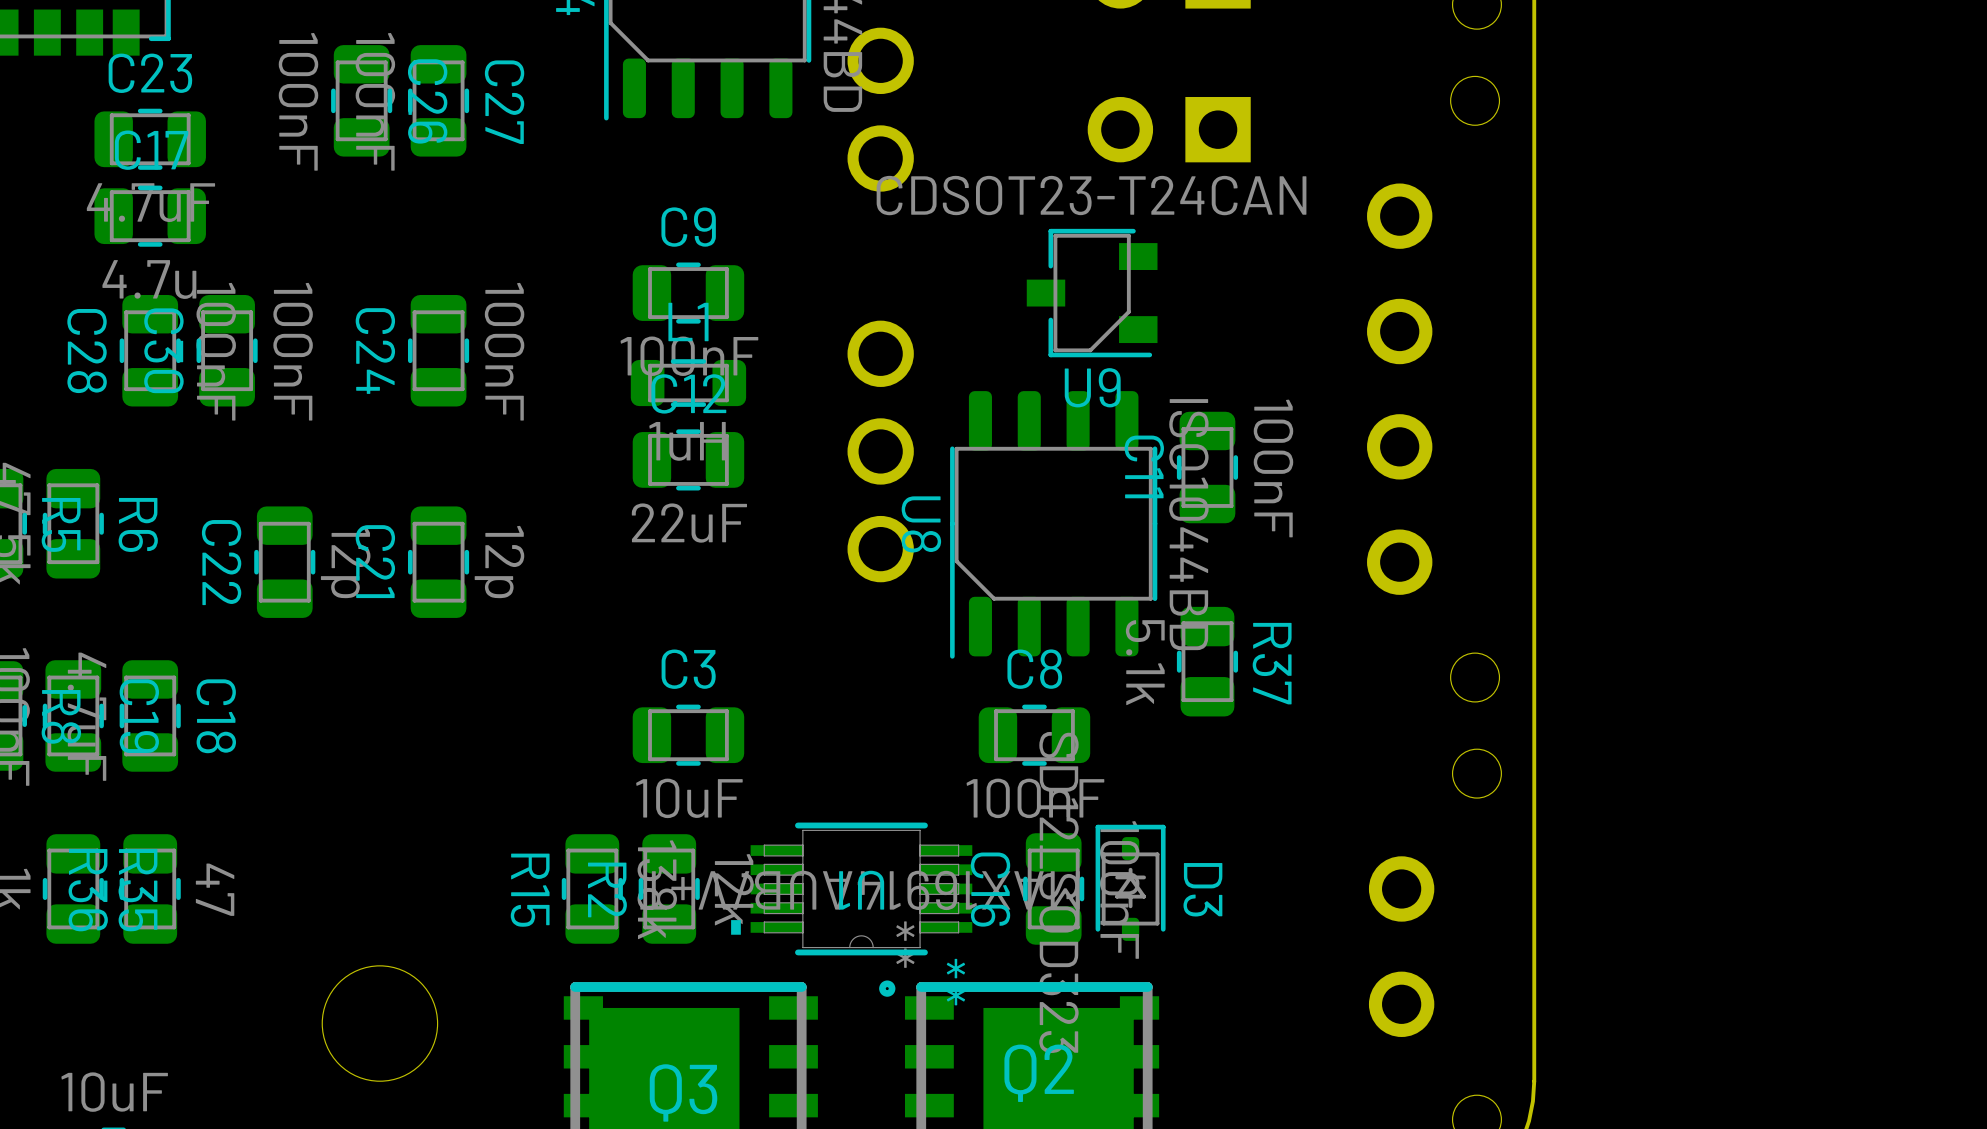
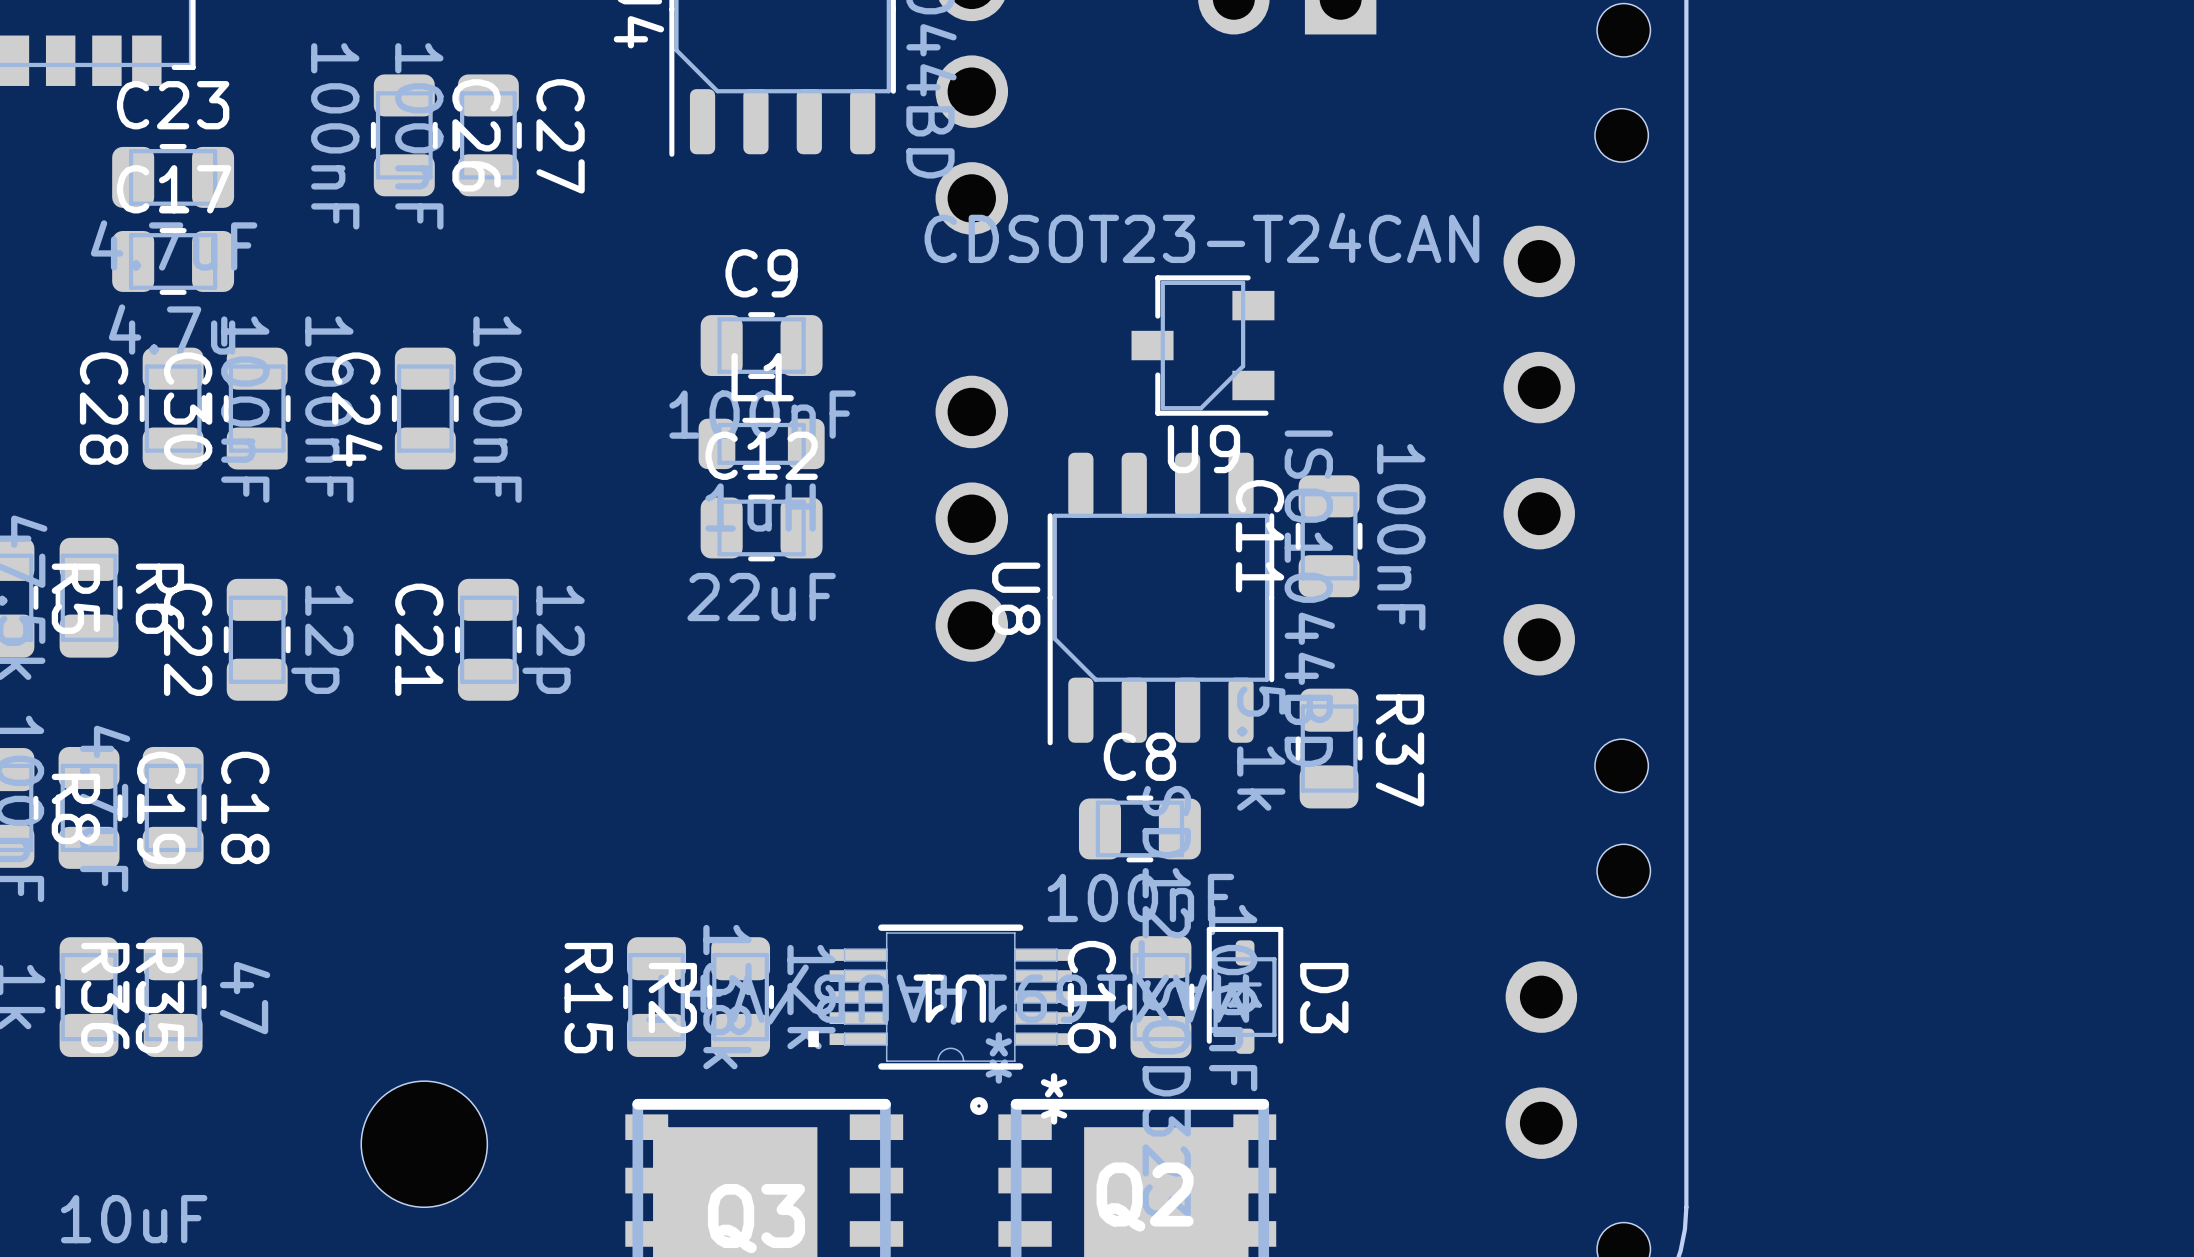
part: (1169, 129) -> none
C24 position: (438, 350) -> (425, 408)
C22 position: (284, 562) -> (257, 639)
C3: 10uF (688, 735) -> none

